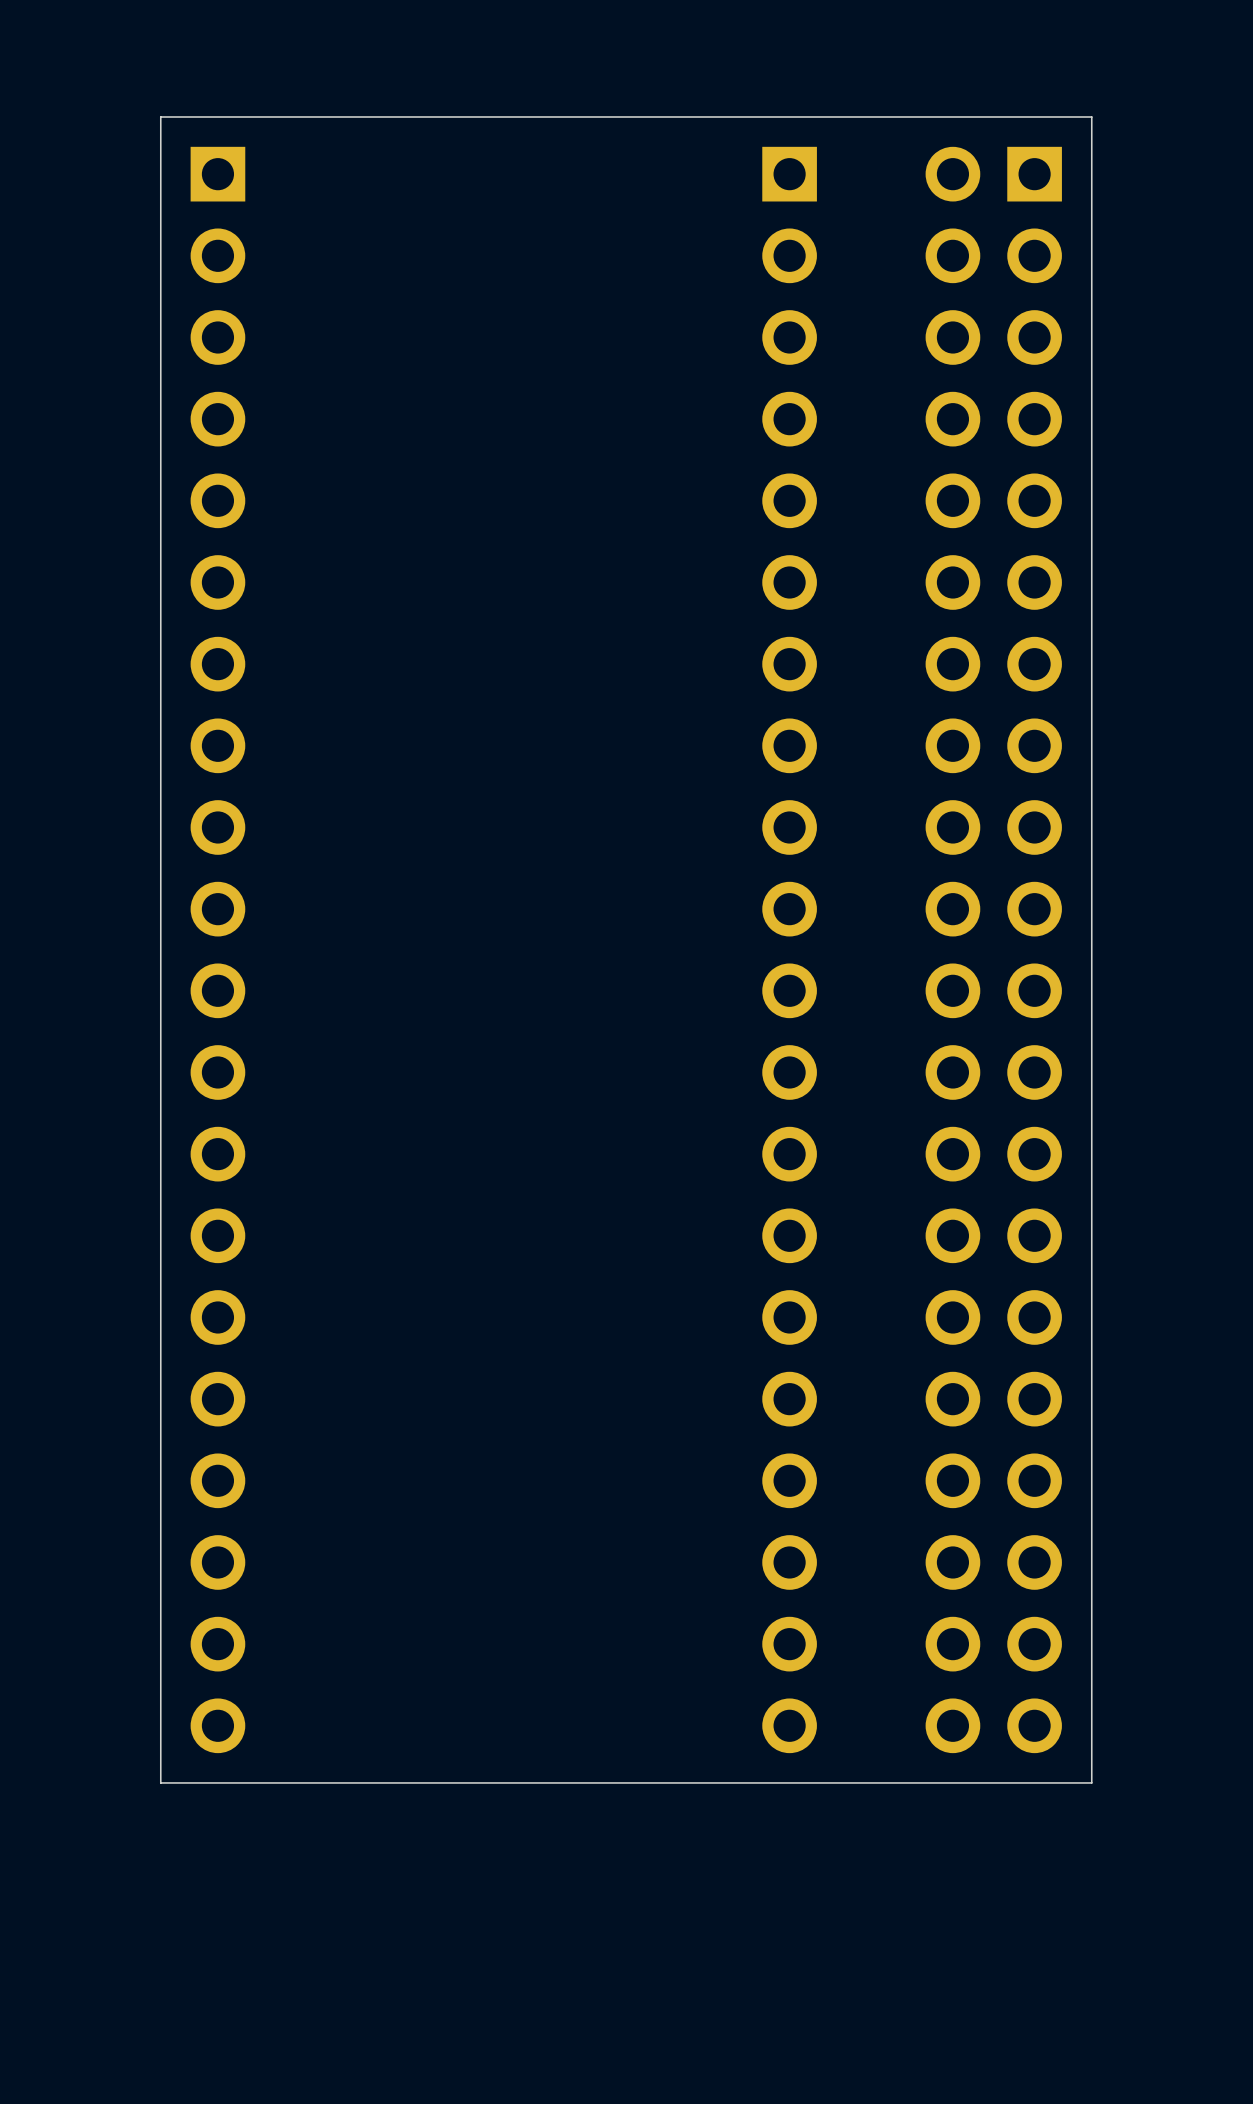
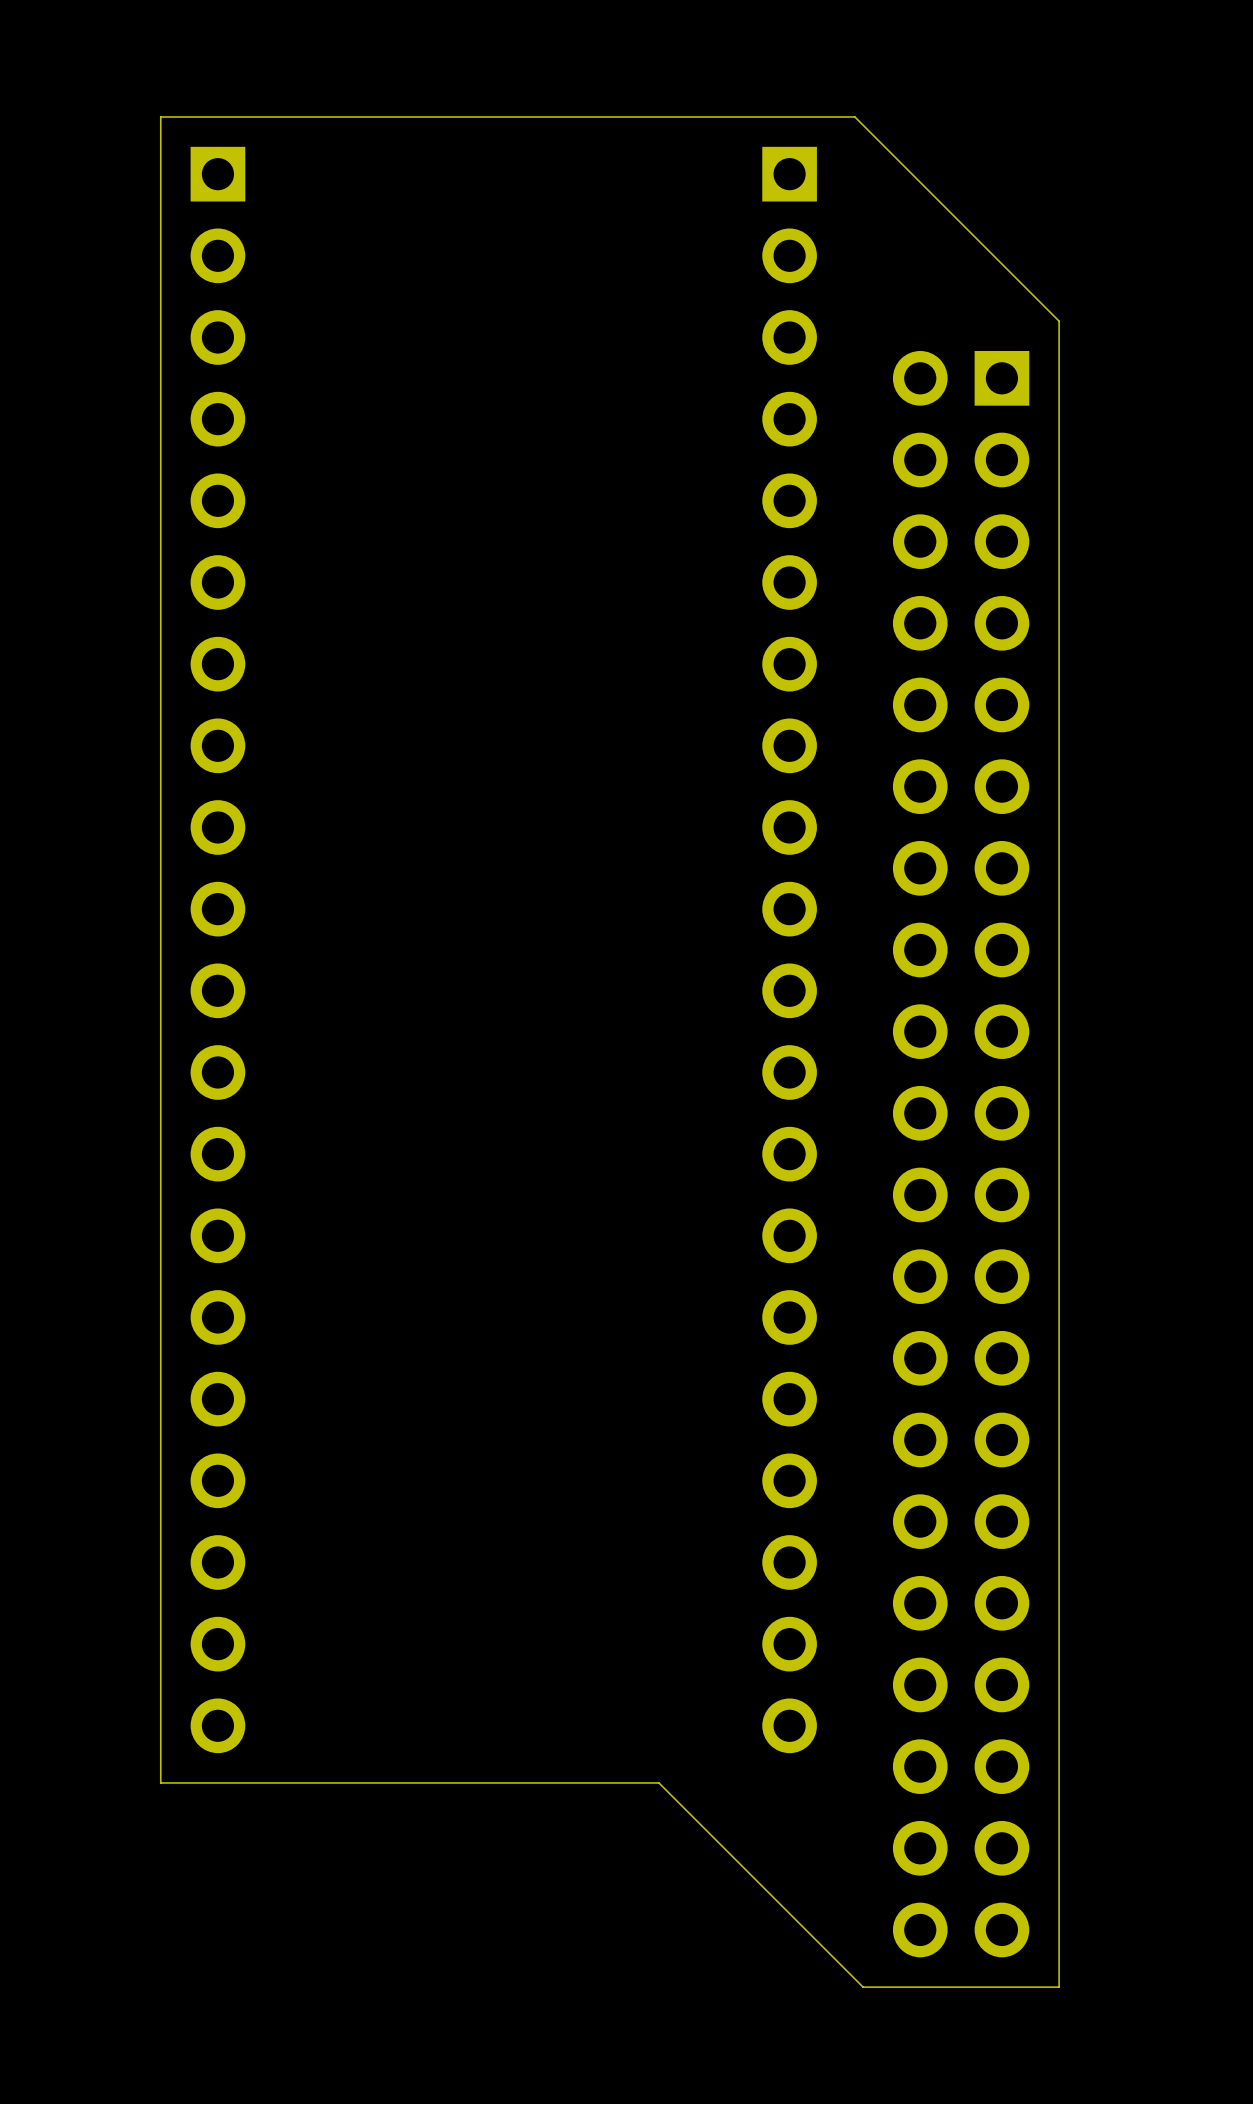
board edge: (854, 116) (1091, 116) (1091, 1782) (658, 1782) -> (854, 116) (1059, 321) (1059, 1987) (863, 1987) (658, 1782)
part position: (993, 949) -> (961, 1154)

